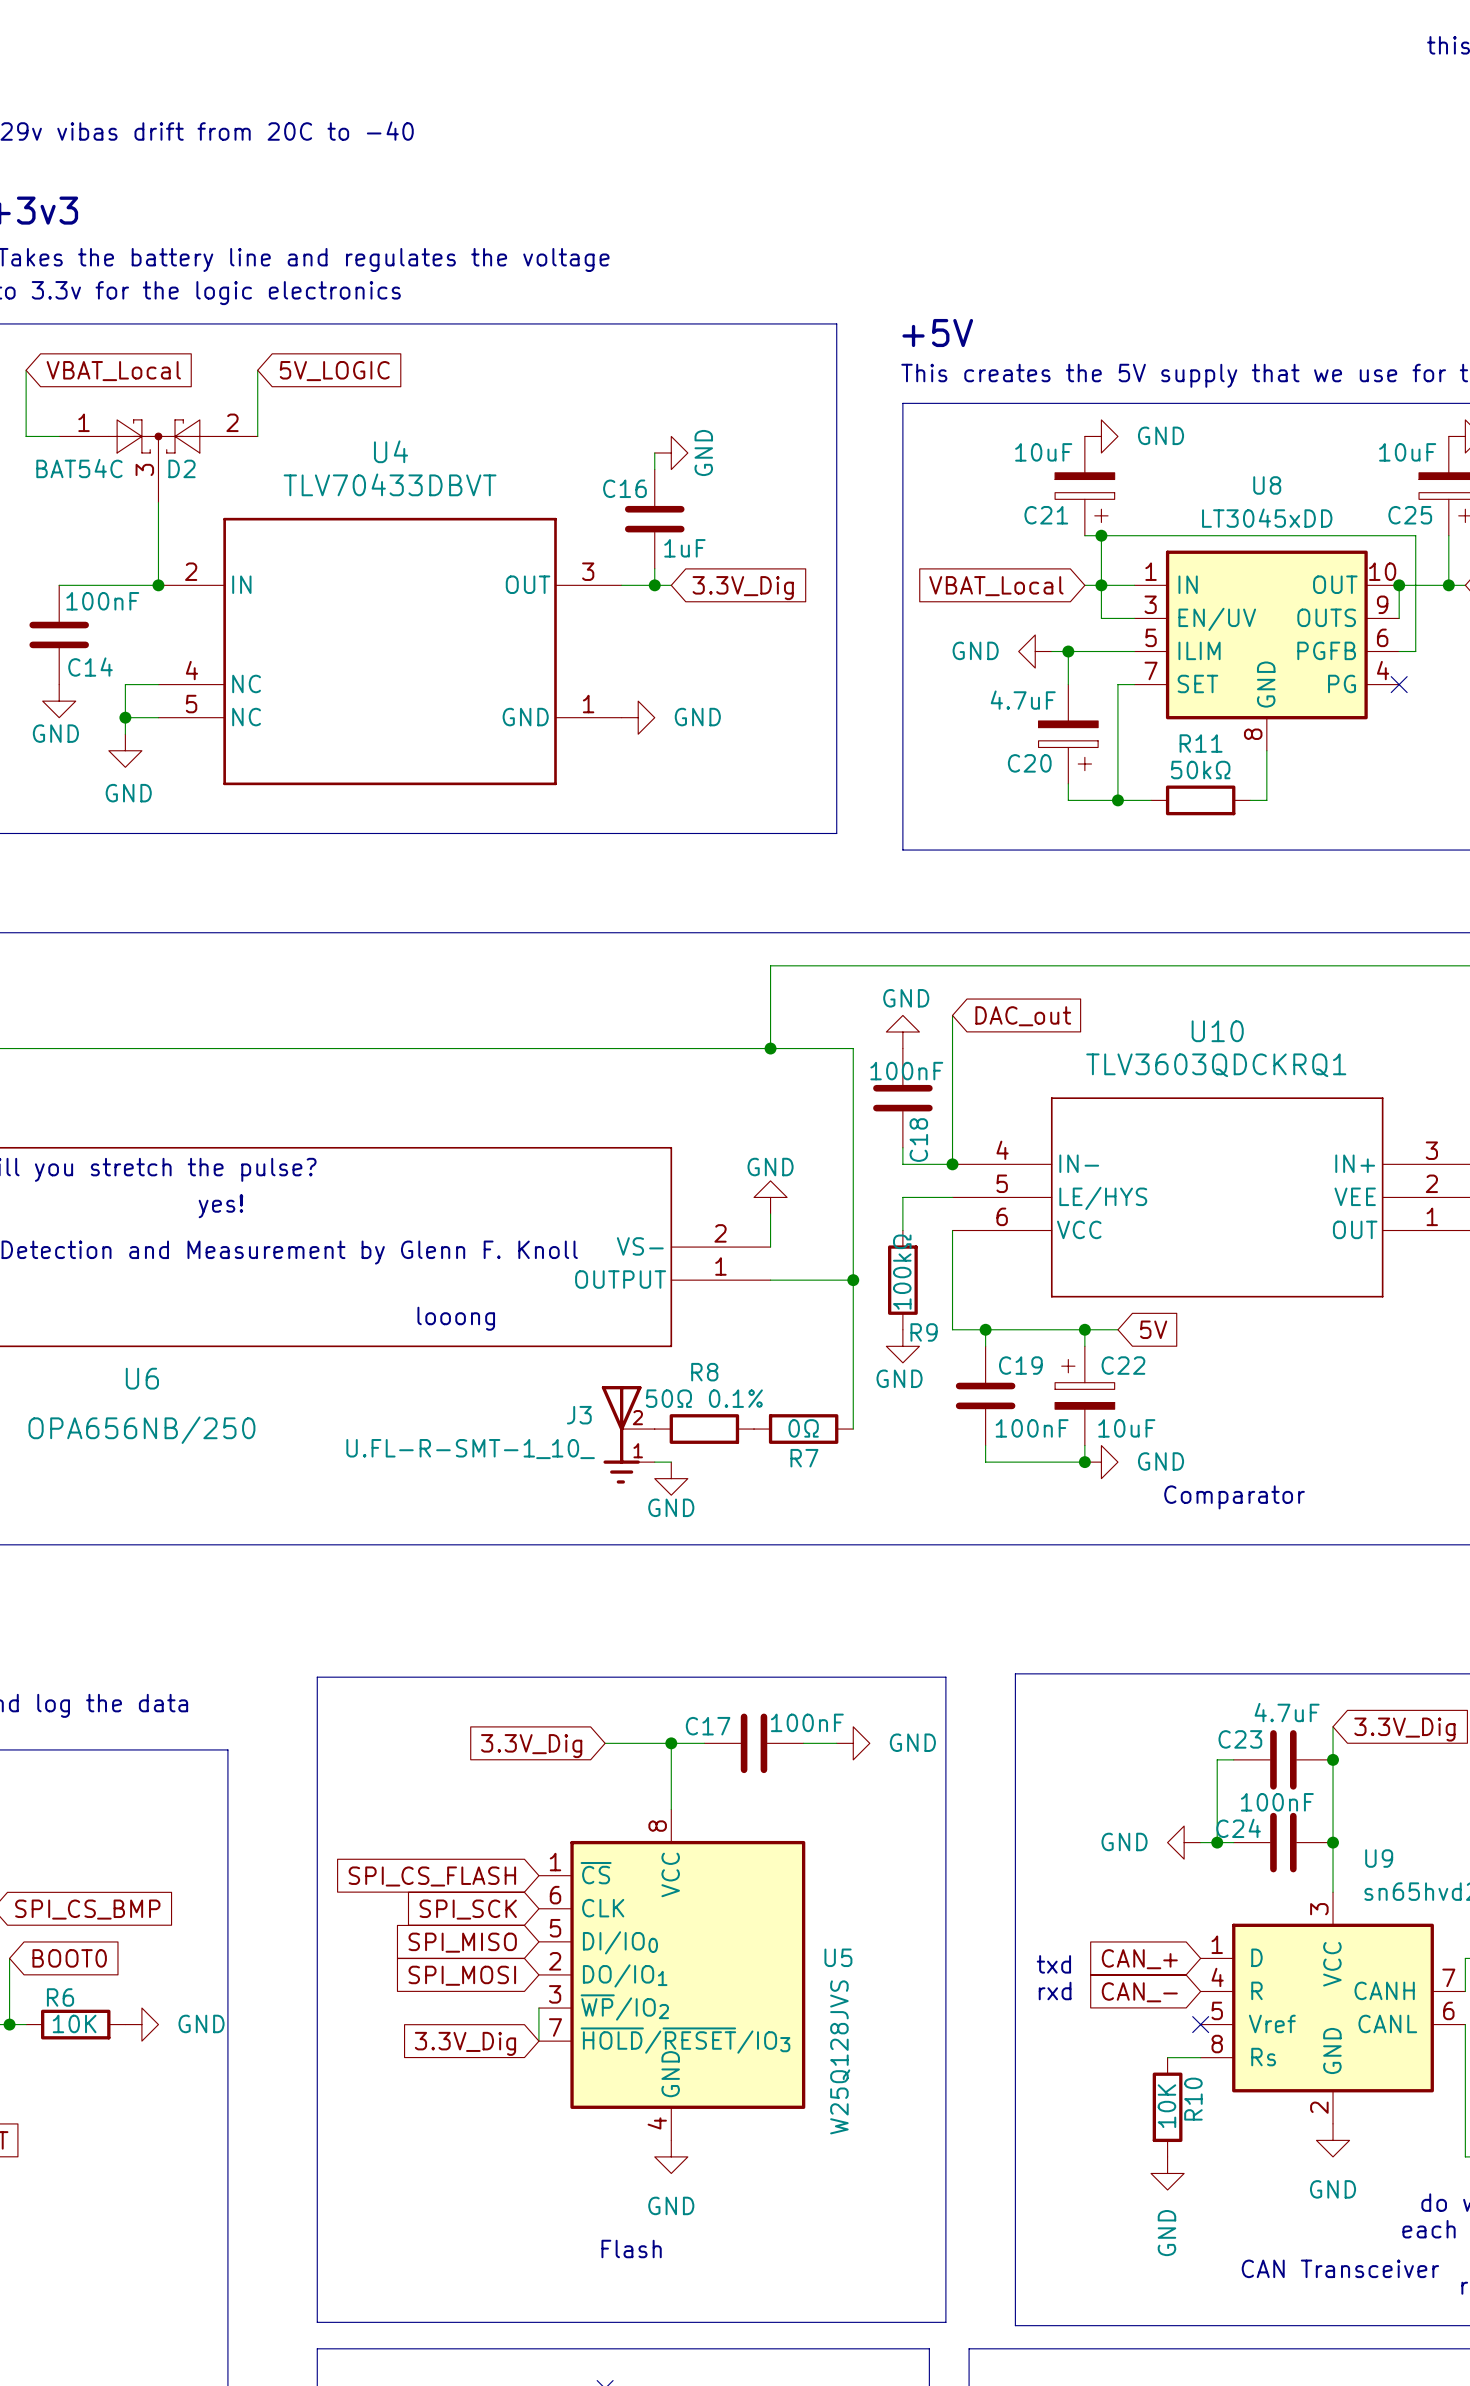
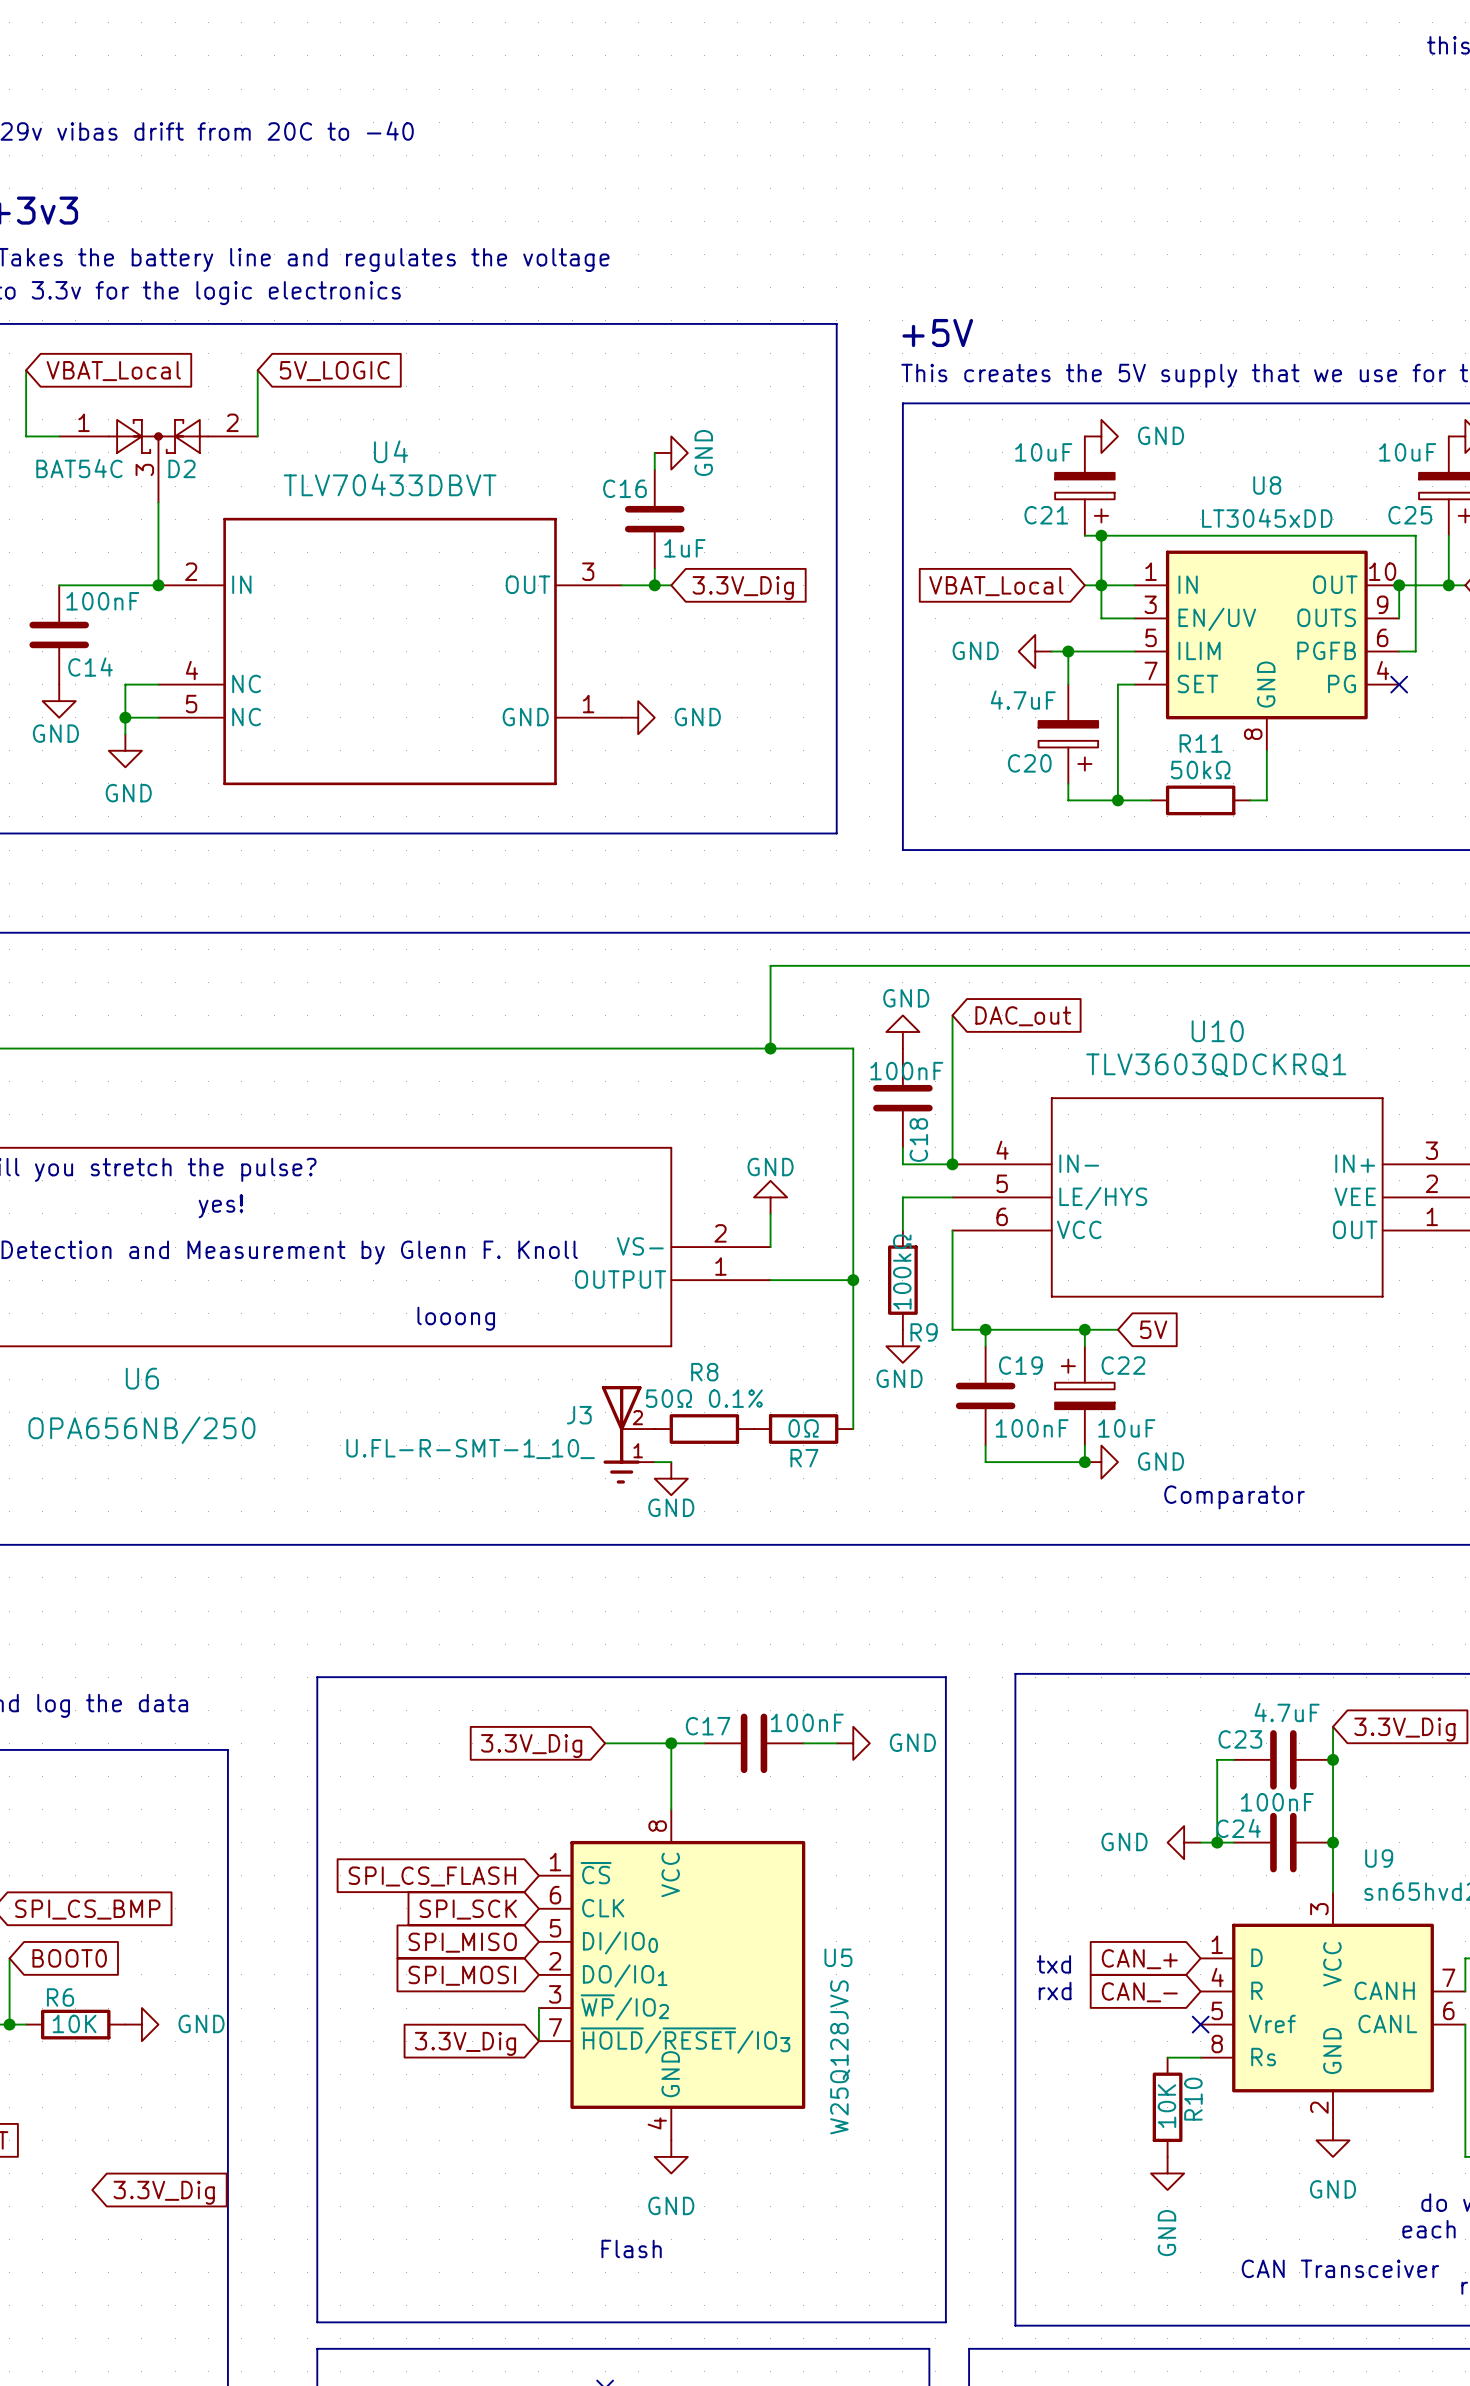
global label: none -> 3.3V_Dig (164, 2192)

